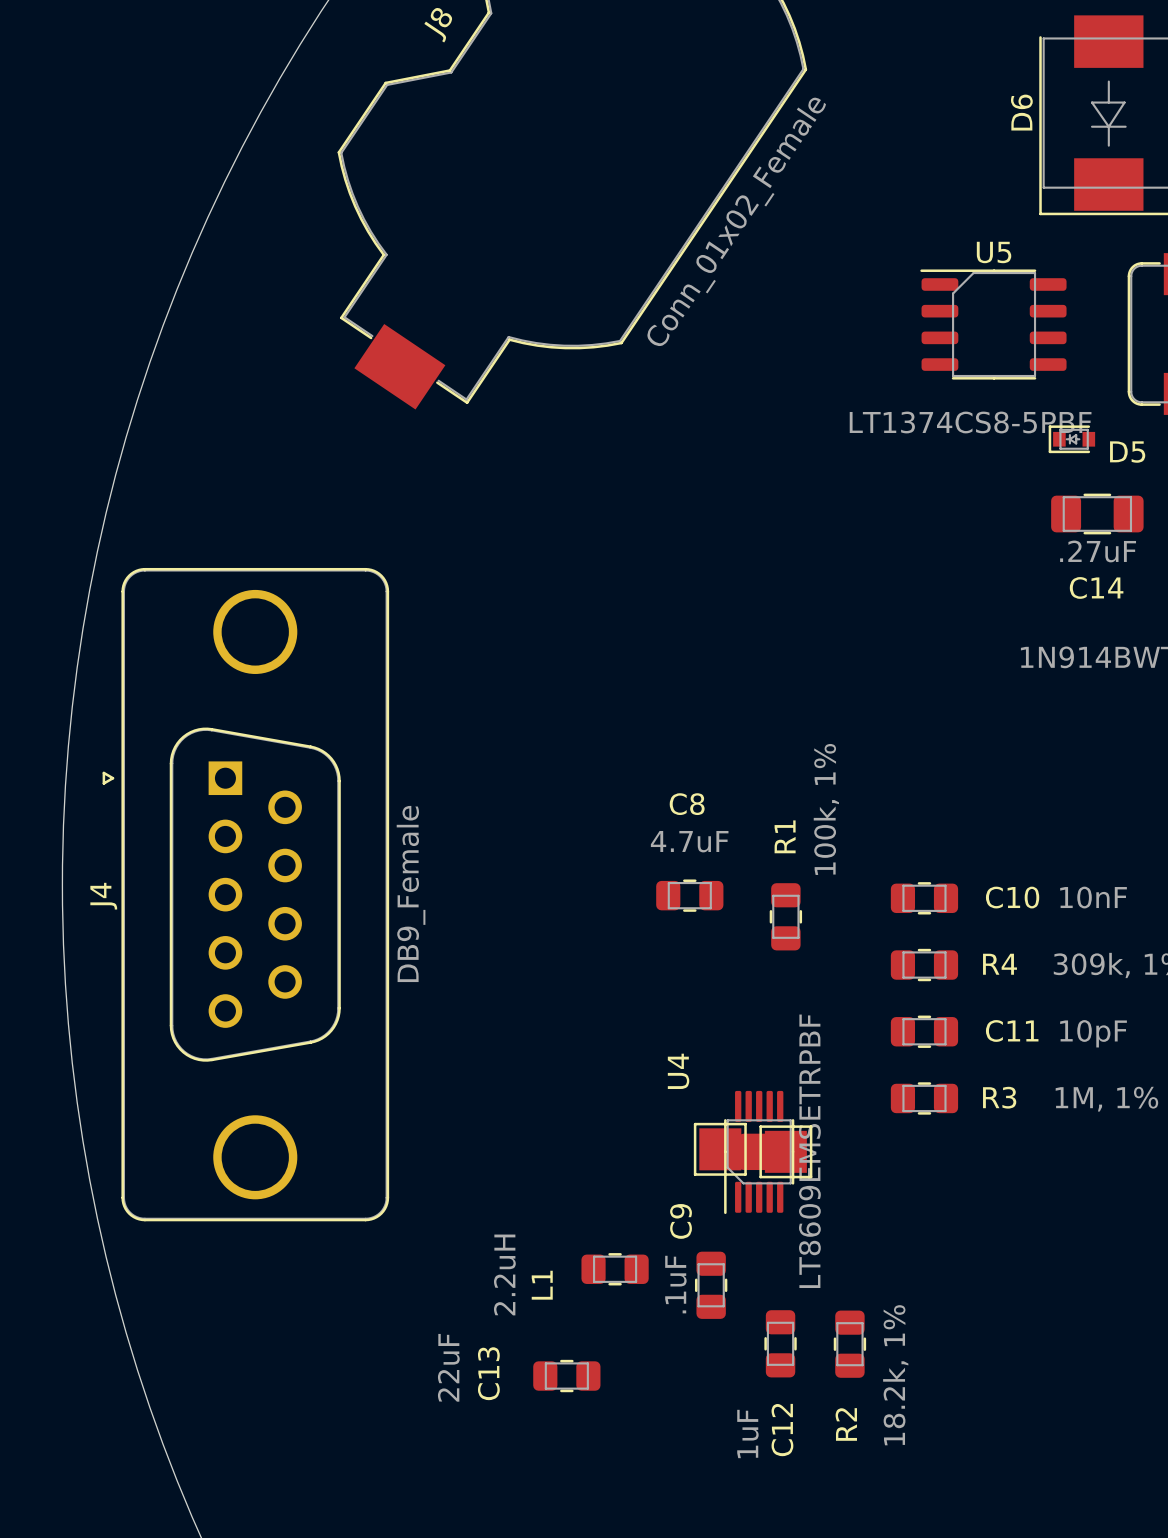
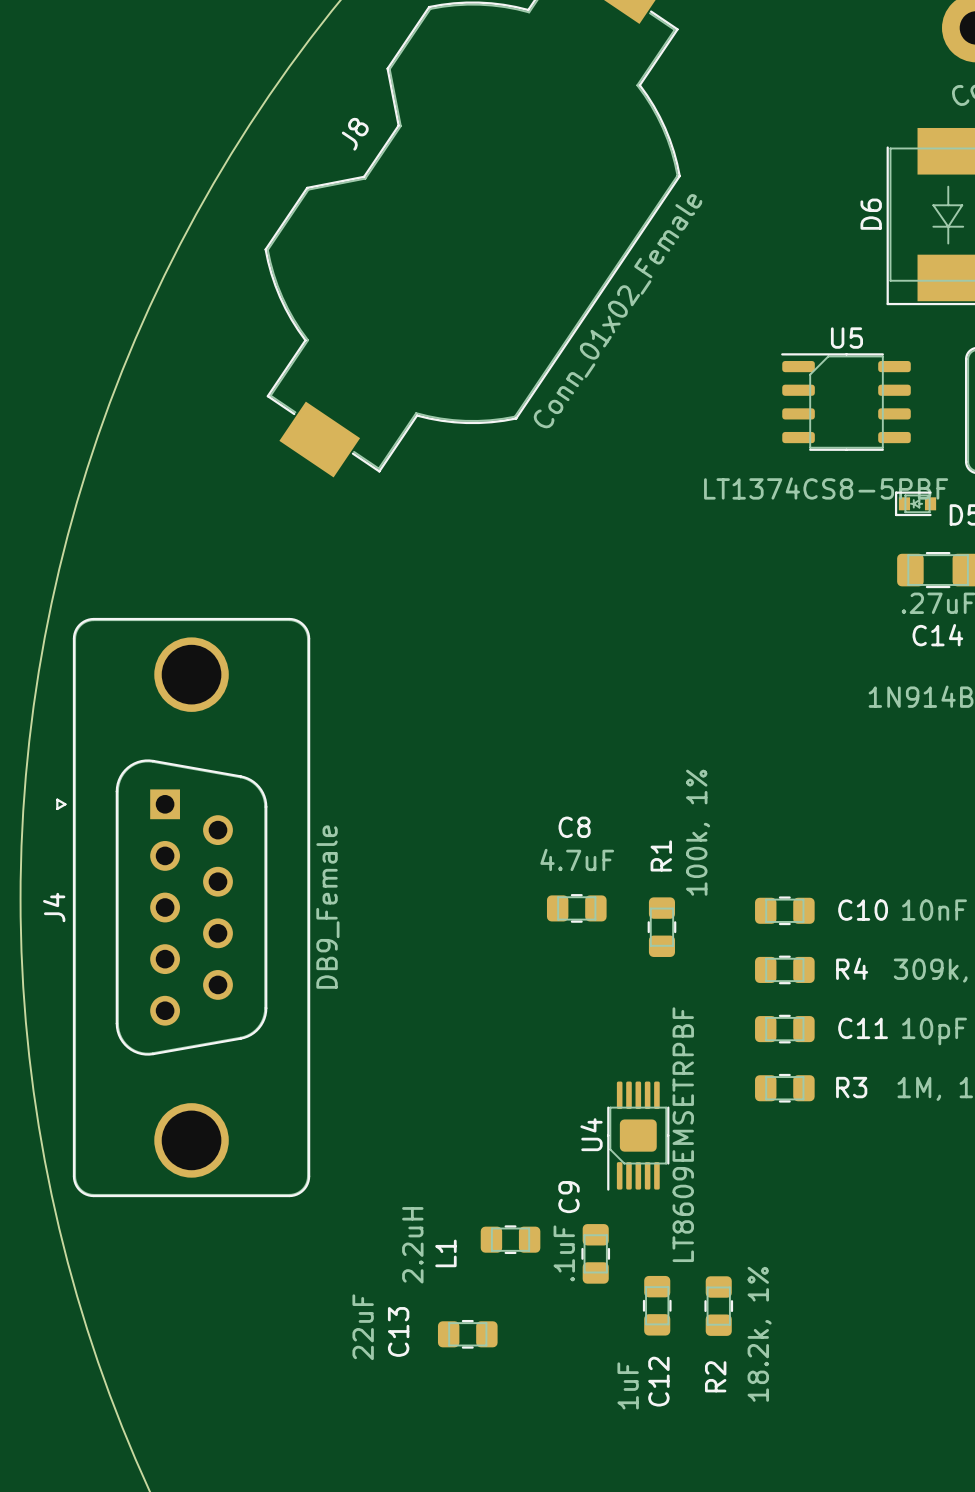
U4 name position: U4 (678, 1071) -> U4 (591, 1134)
part: (720, 1149) -> none
part: (785, 1151) -> none

